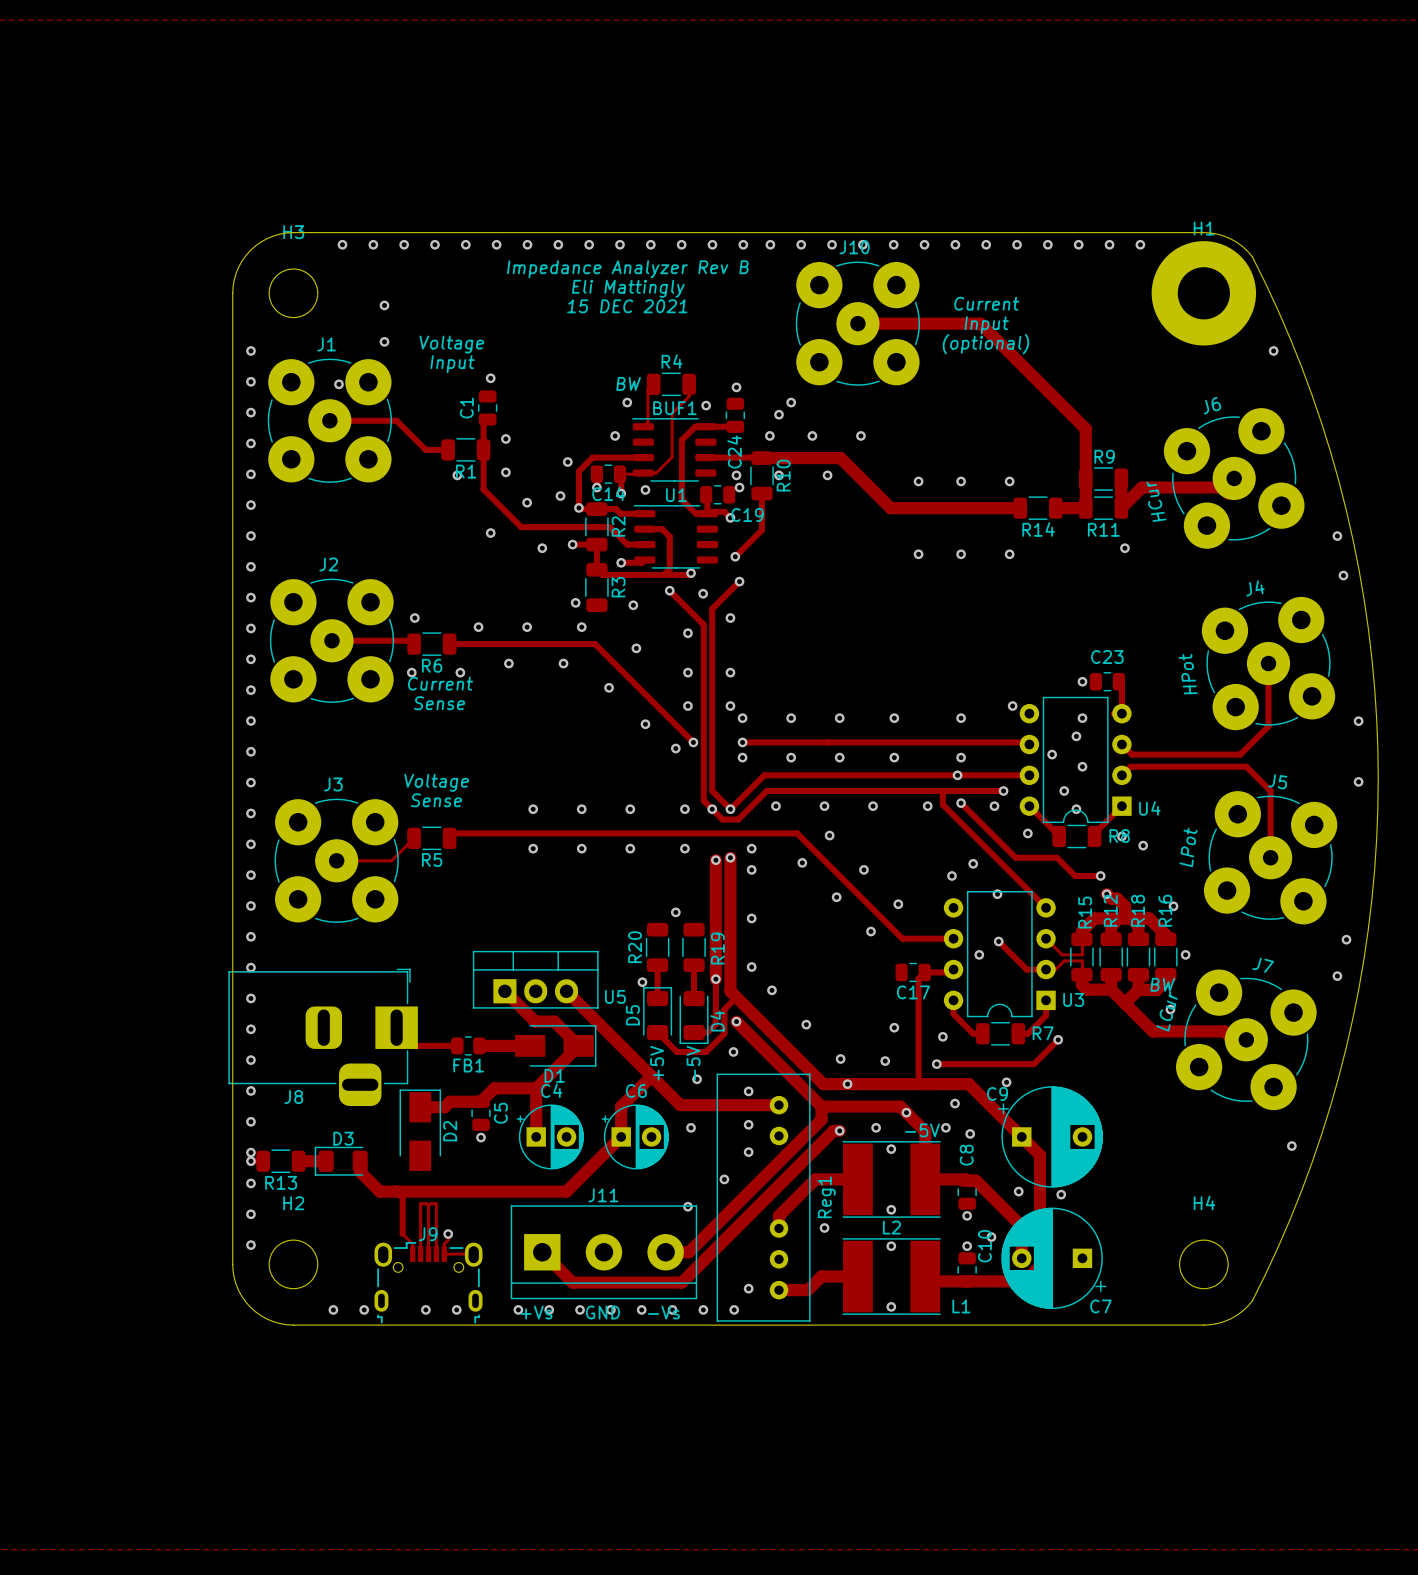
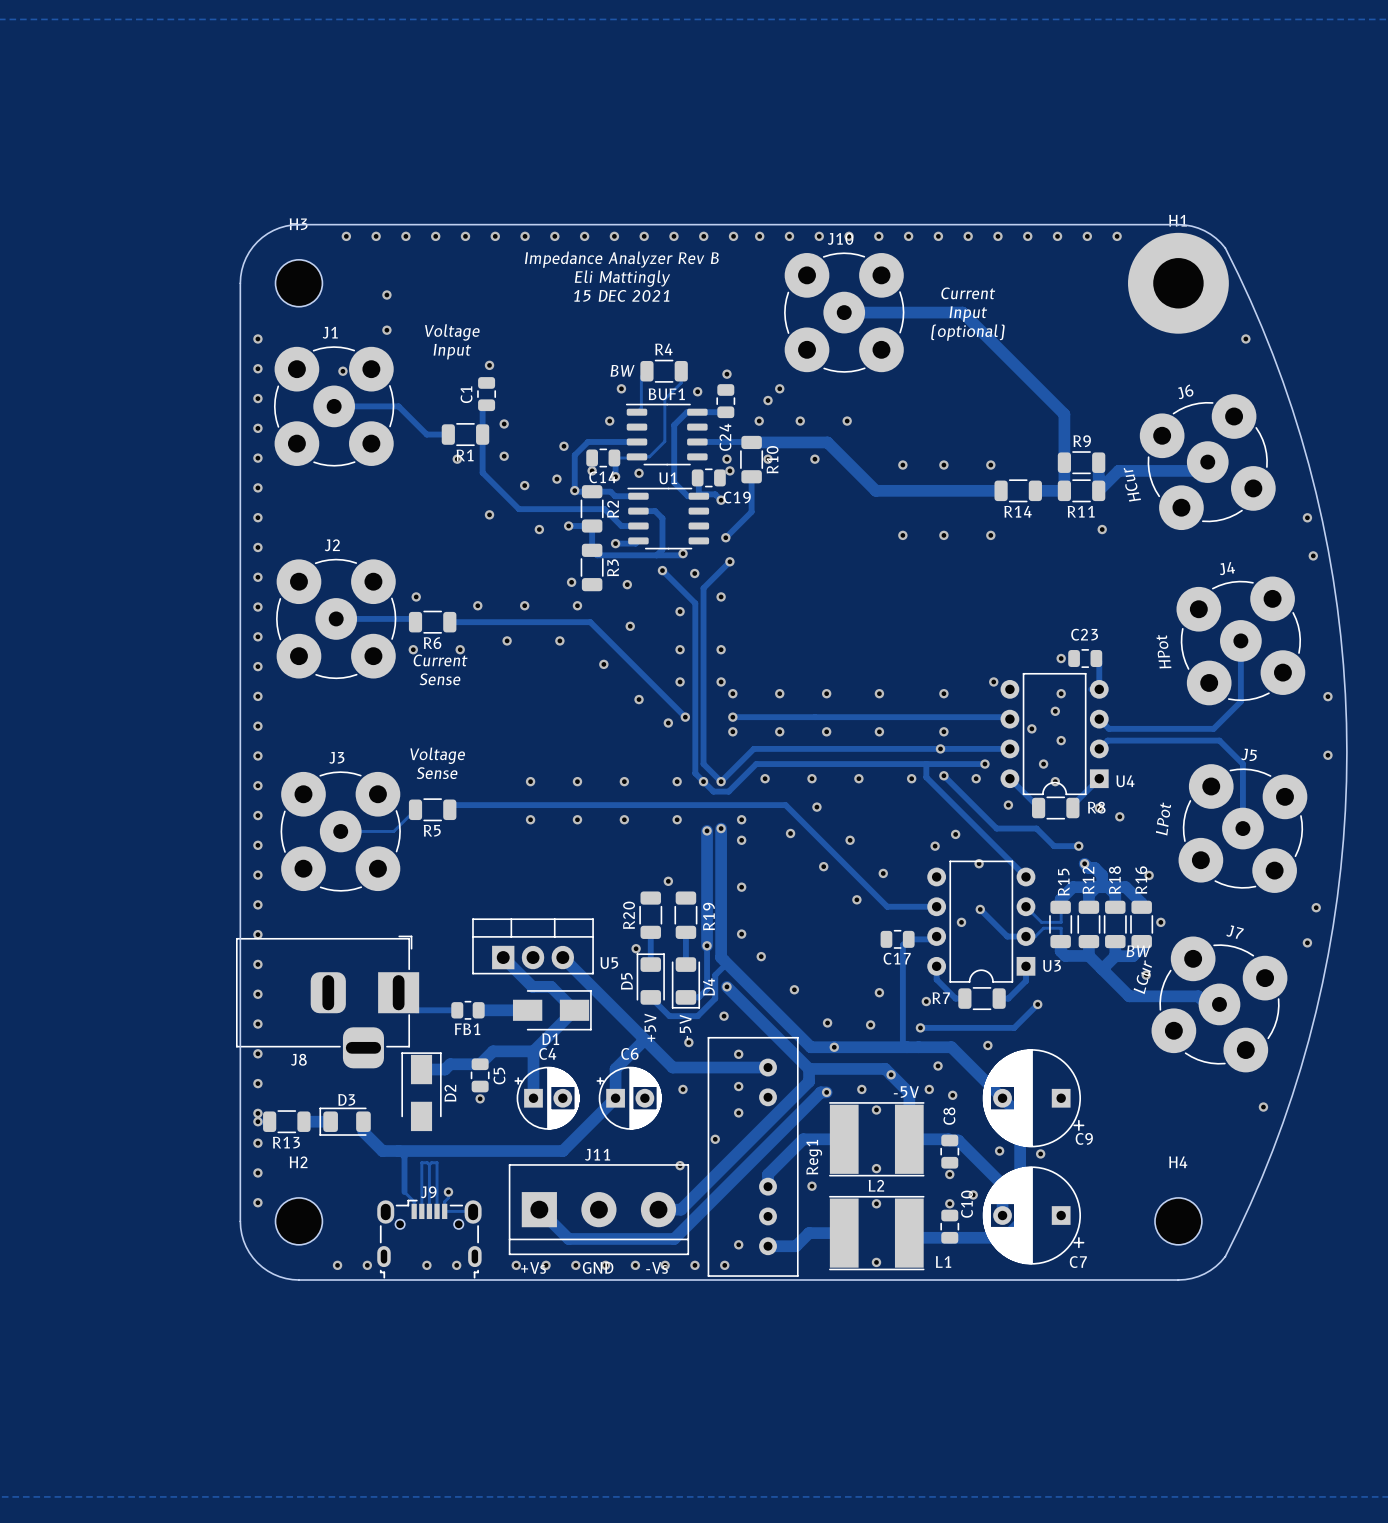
R7 name position: R7 (1043, 1033) -> R7 (941, 998)
C9 rotation: 0° (1050, 1136) -> 180° (1033, 1098)

